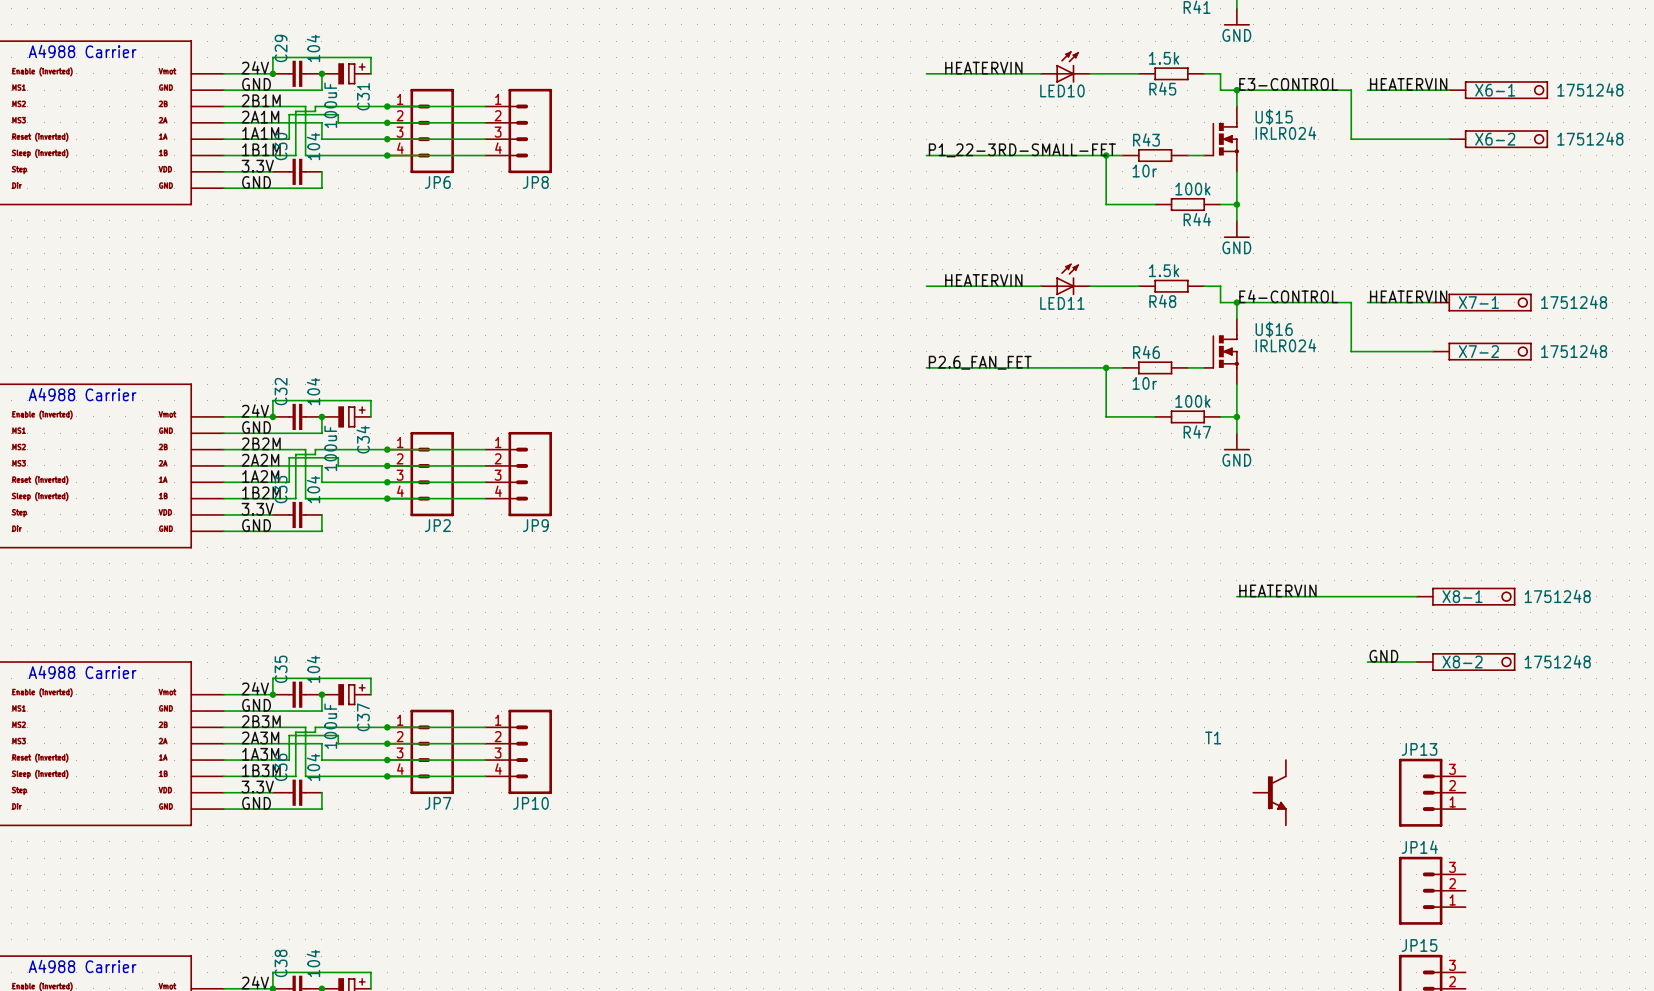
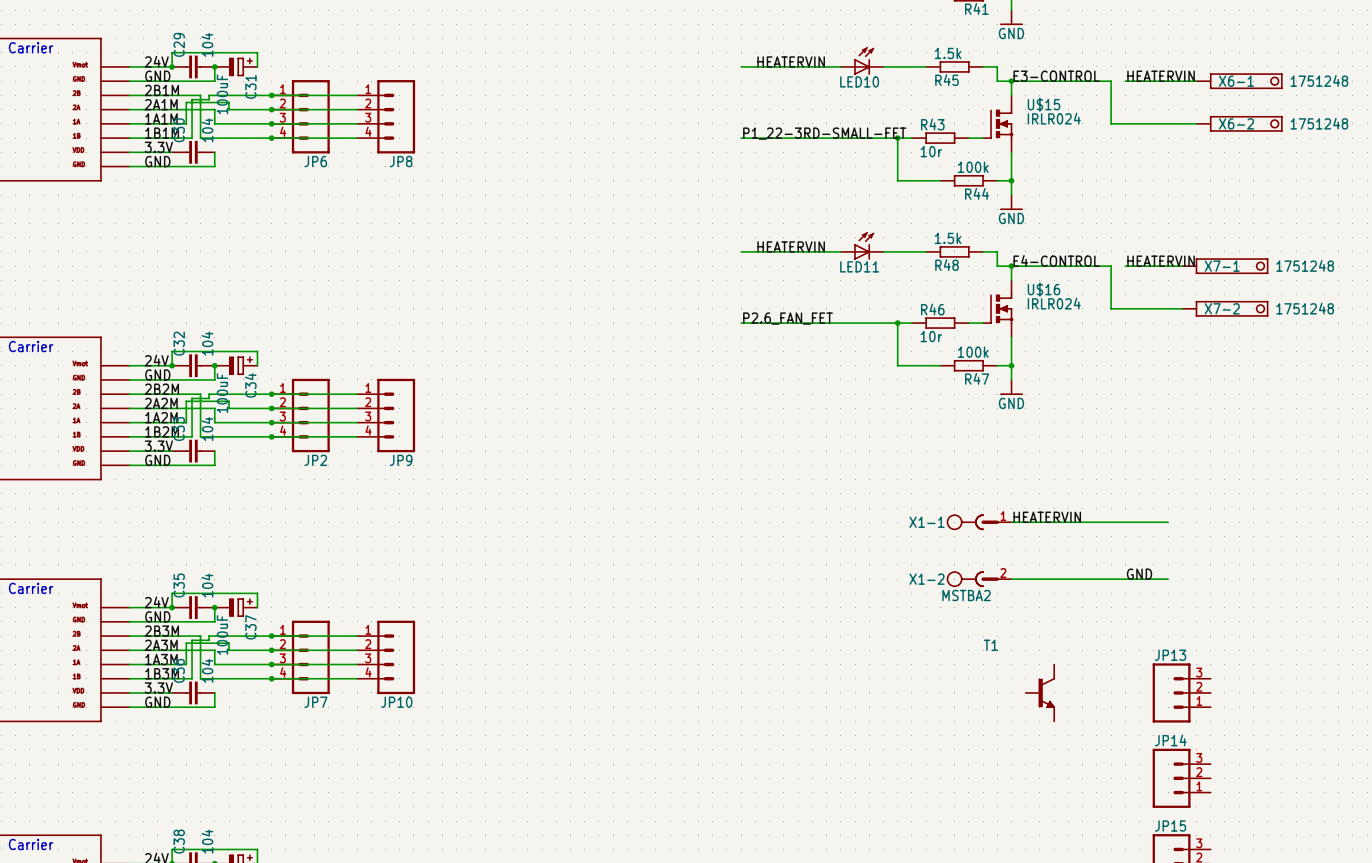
X1-1: none -> (979, 522)
X8-1: 1751248 (1466, 596) -> none
X1-2: none -> MSTBA2 (979, 579)
wire: none -> (1011, 579) (1125, 579)
X8-2: 1751248 (1466, 662) -> none

